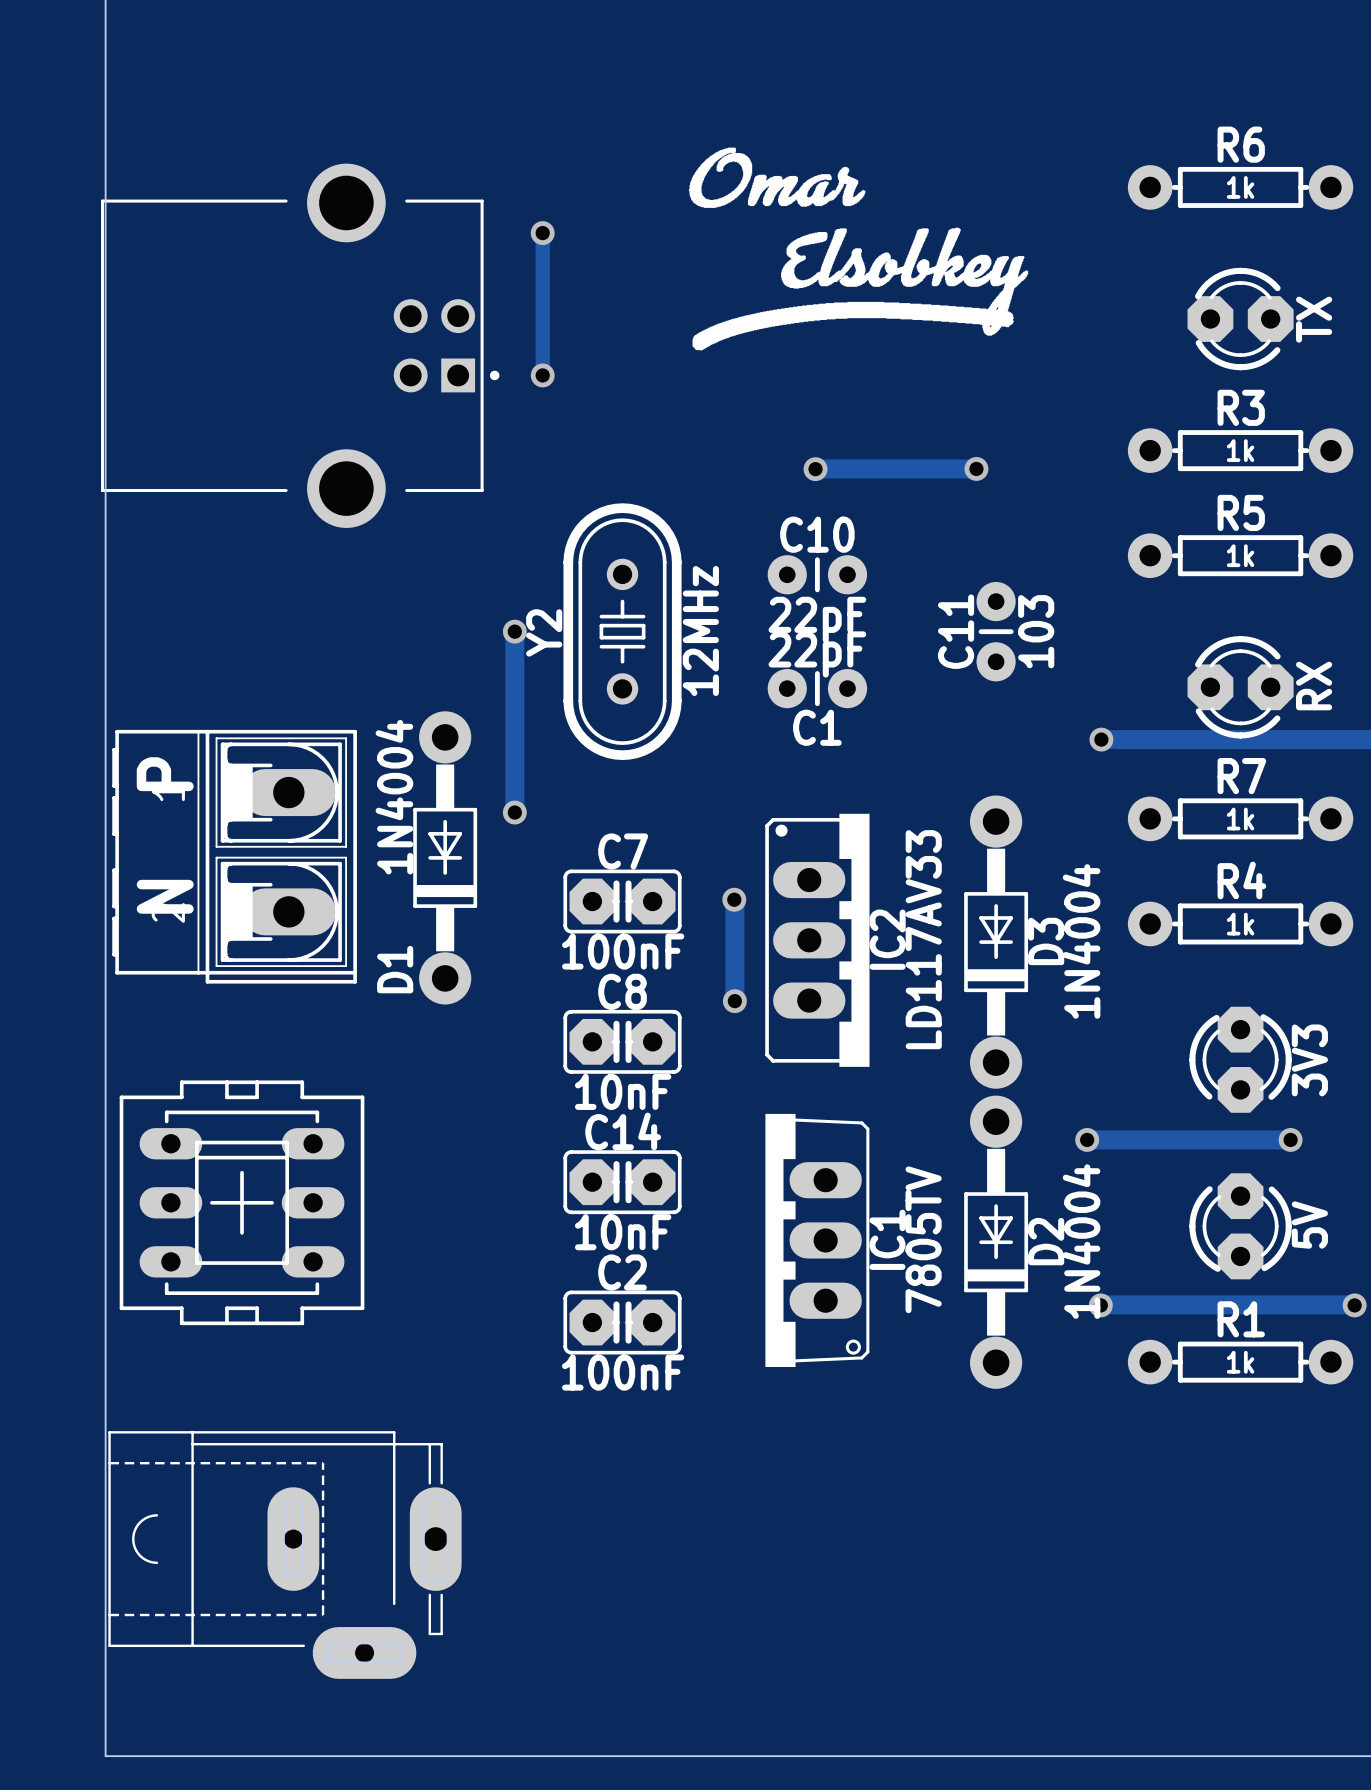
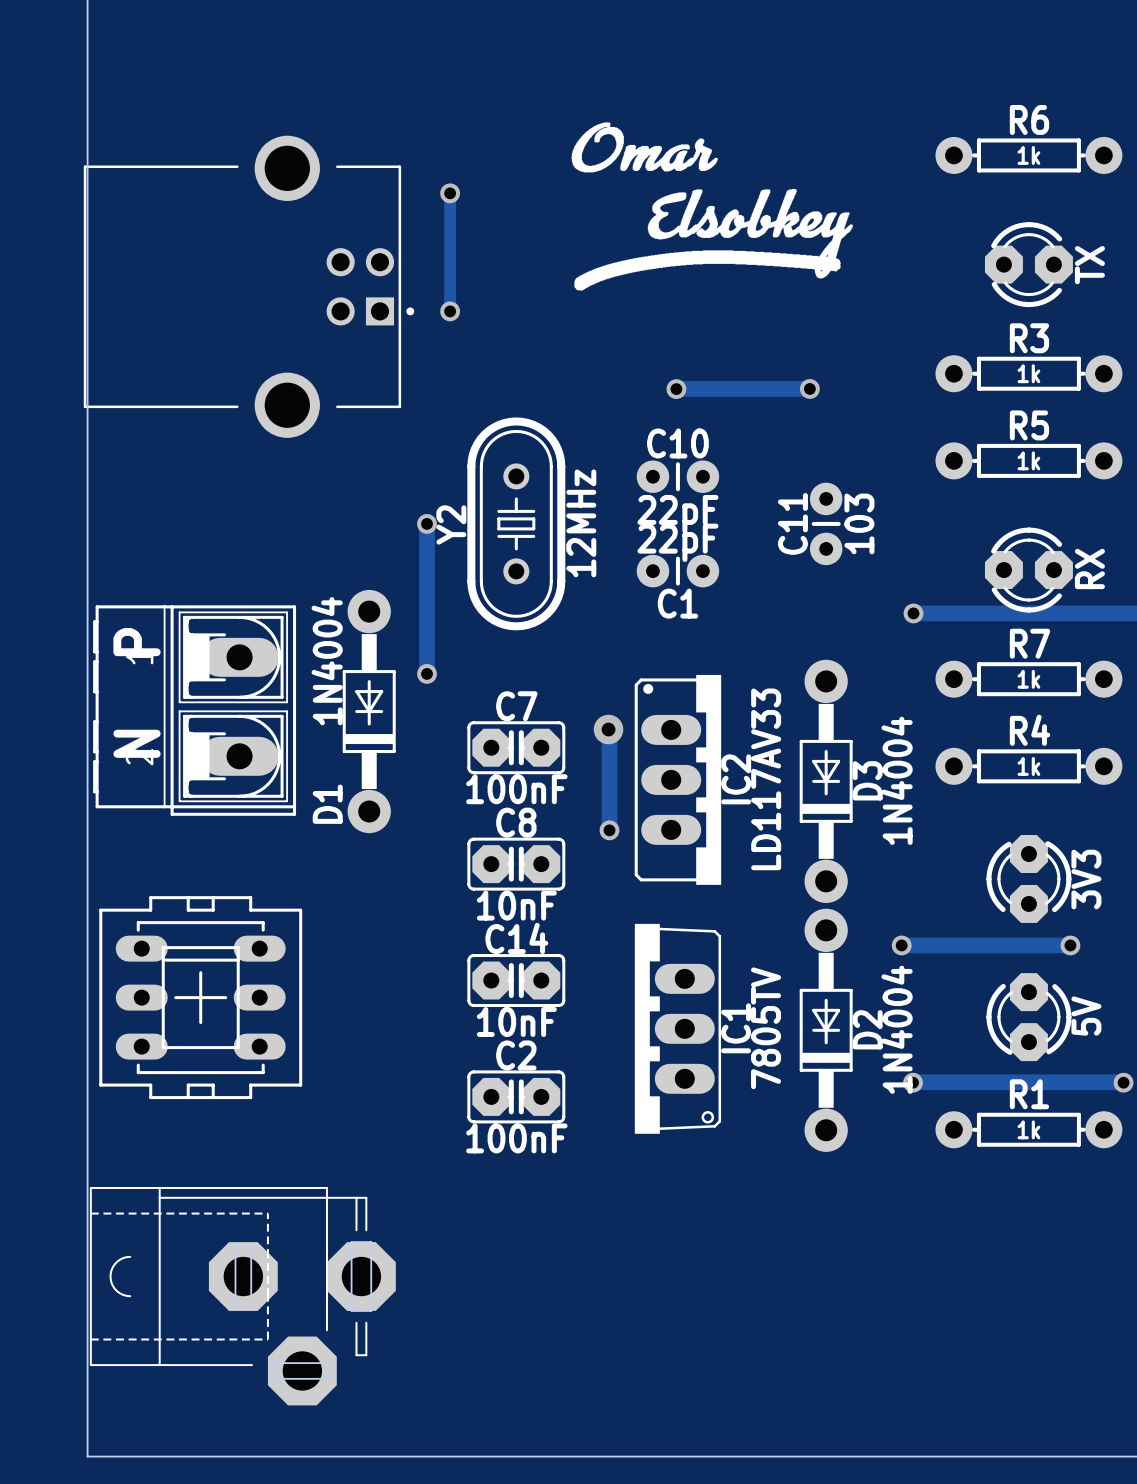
via size: [722, 887, 747, 912] -> [593, 714, 624, 745]
part footprint: [108, 1431, 462, 1679] -> [89, 1187, 396, 1406]

